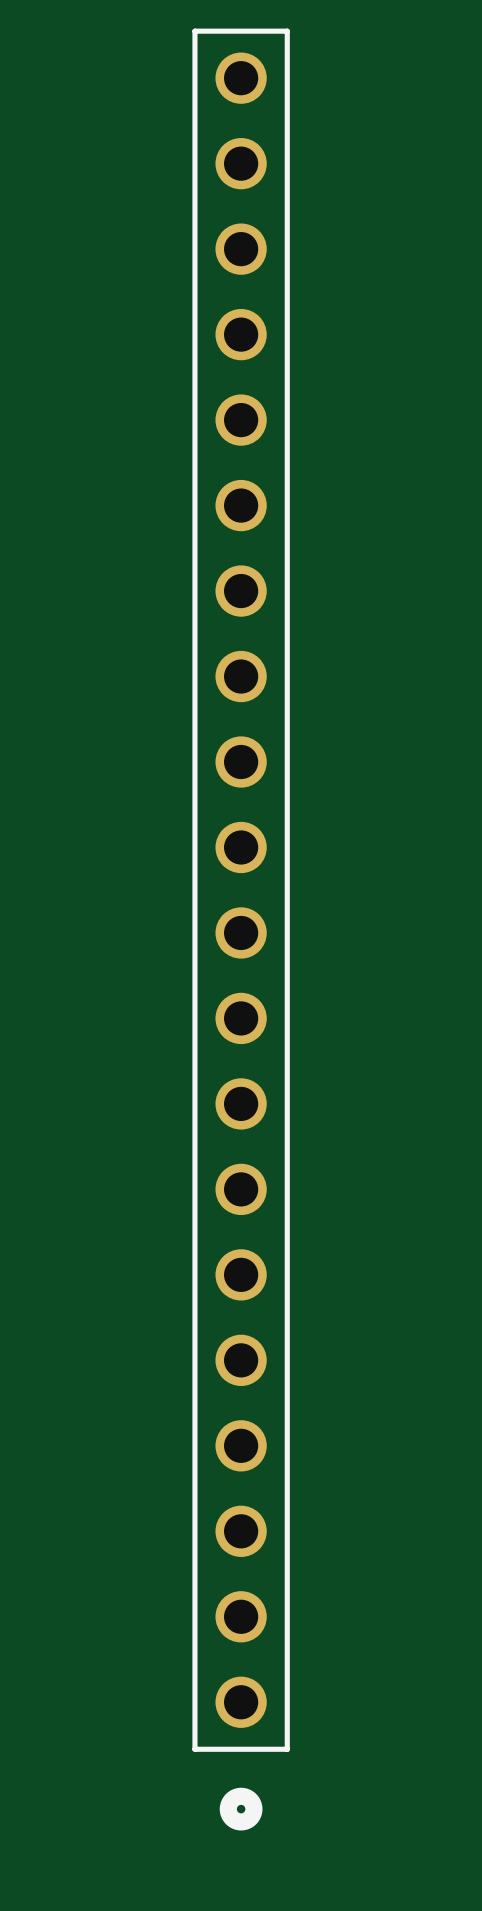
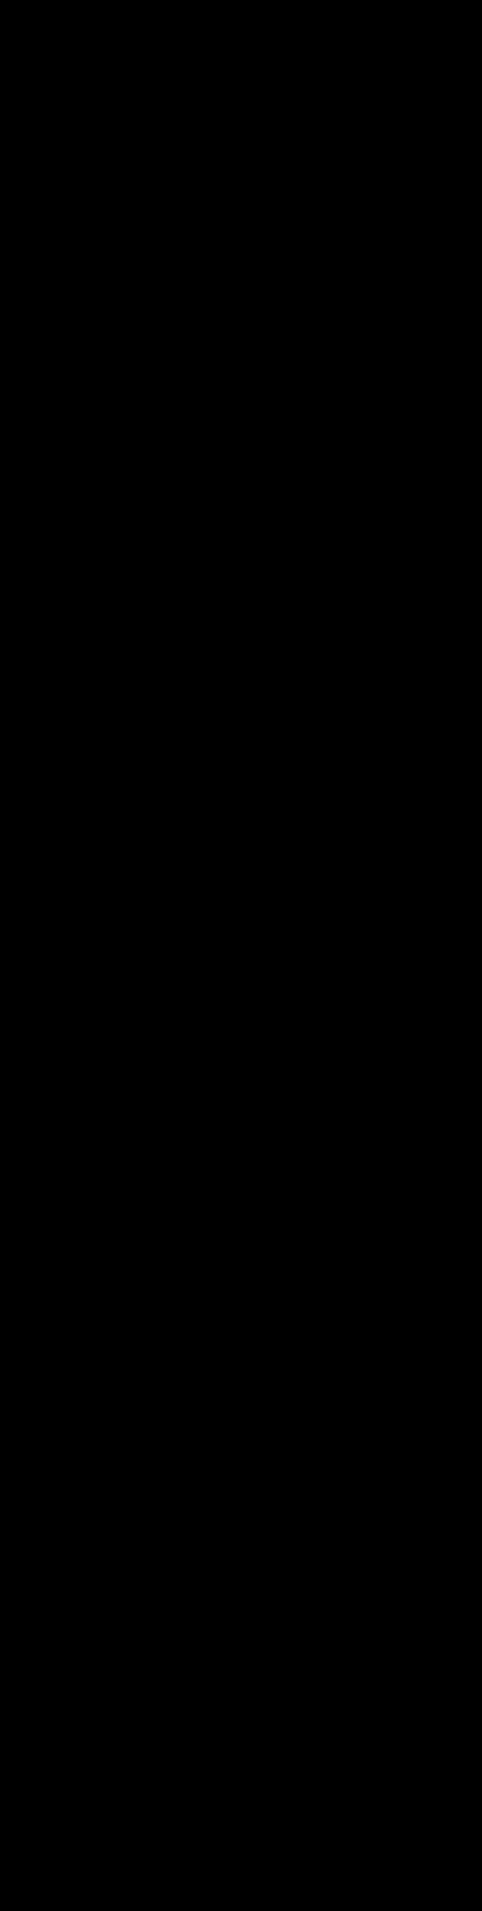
part: (241, 929) -> none

